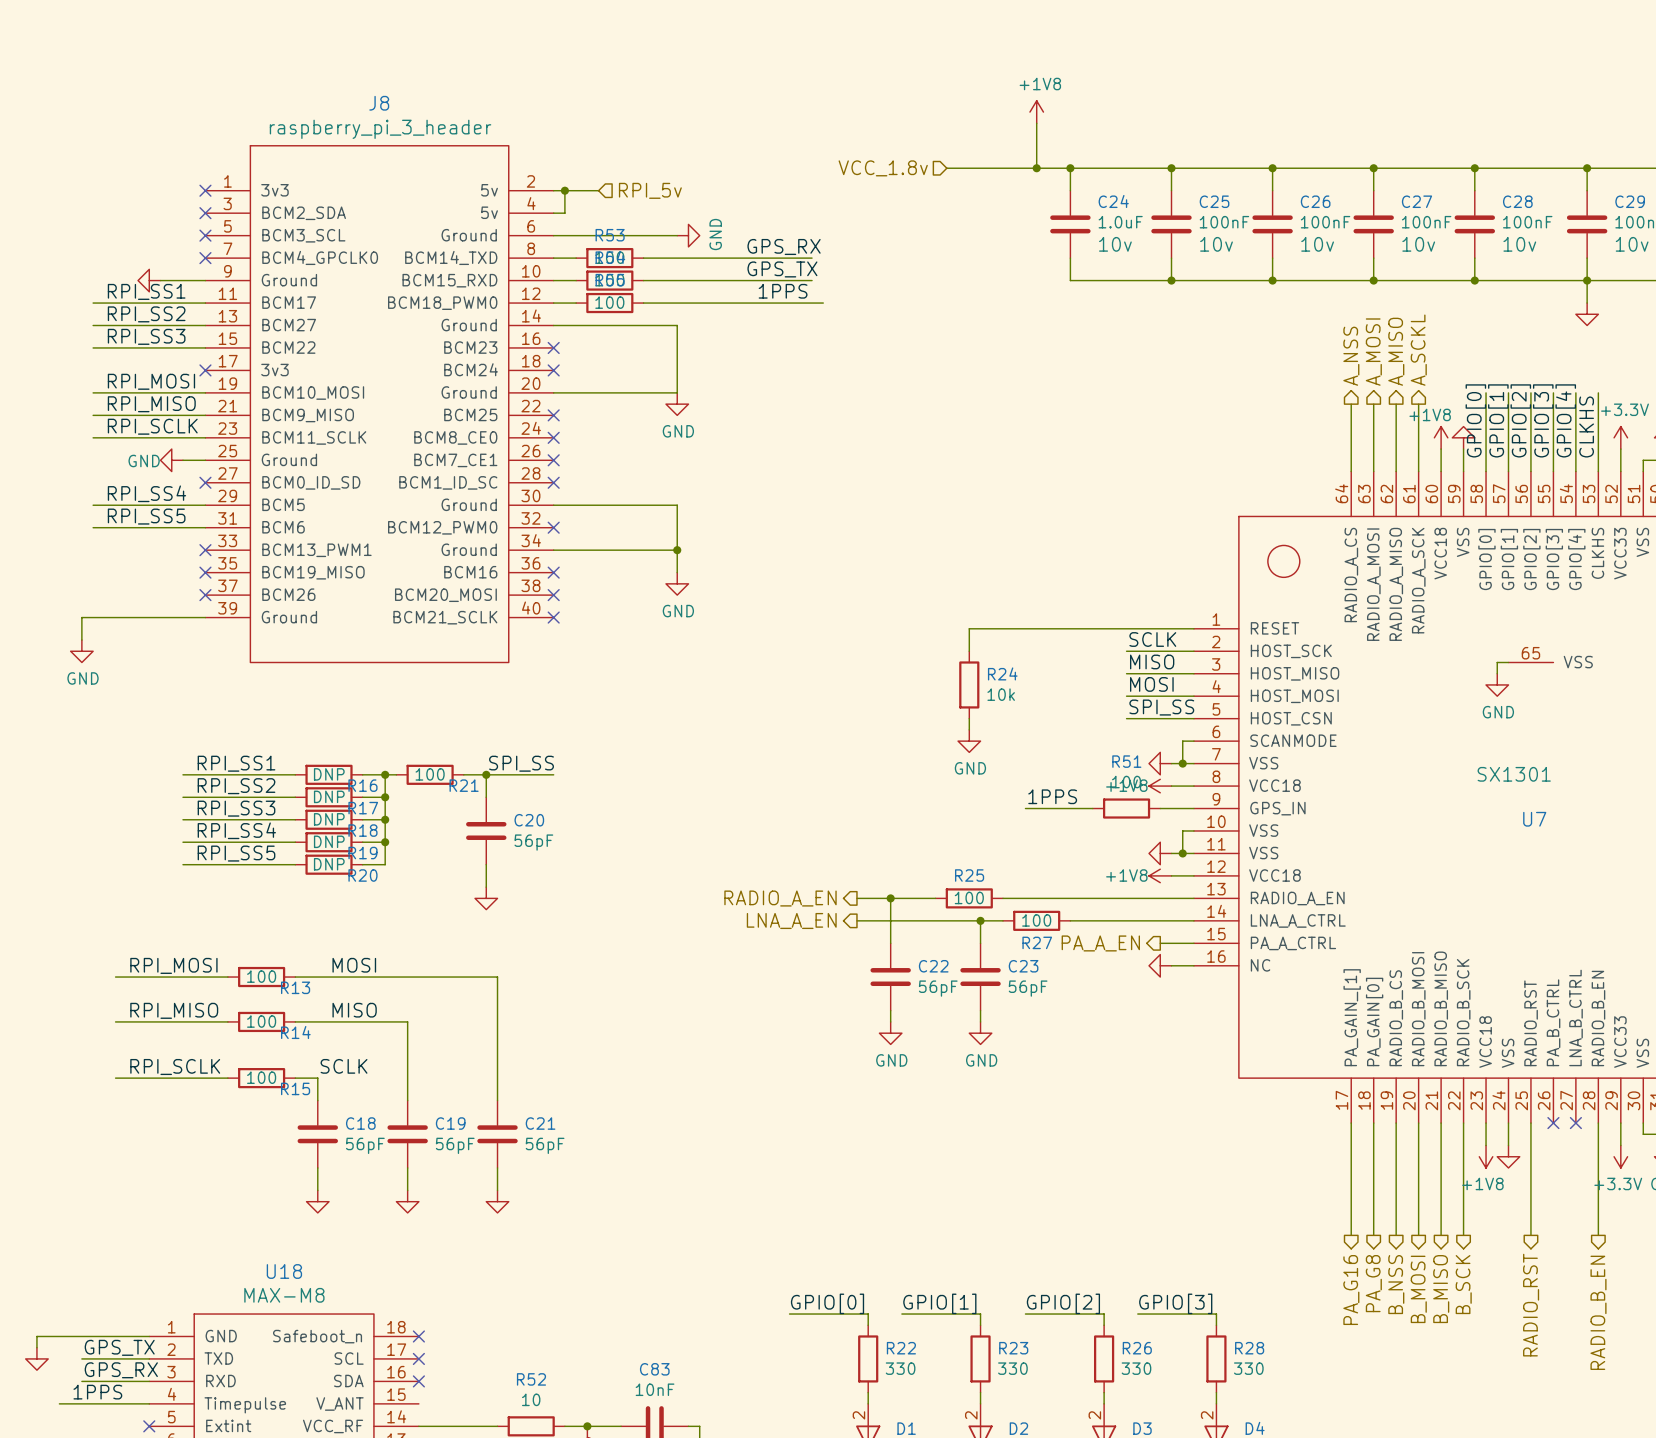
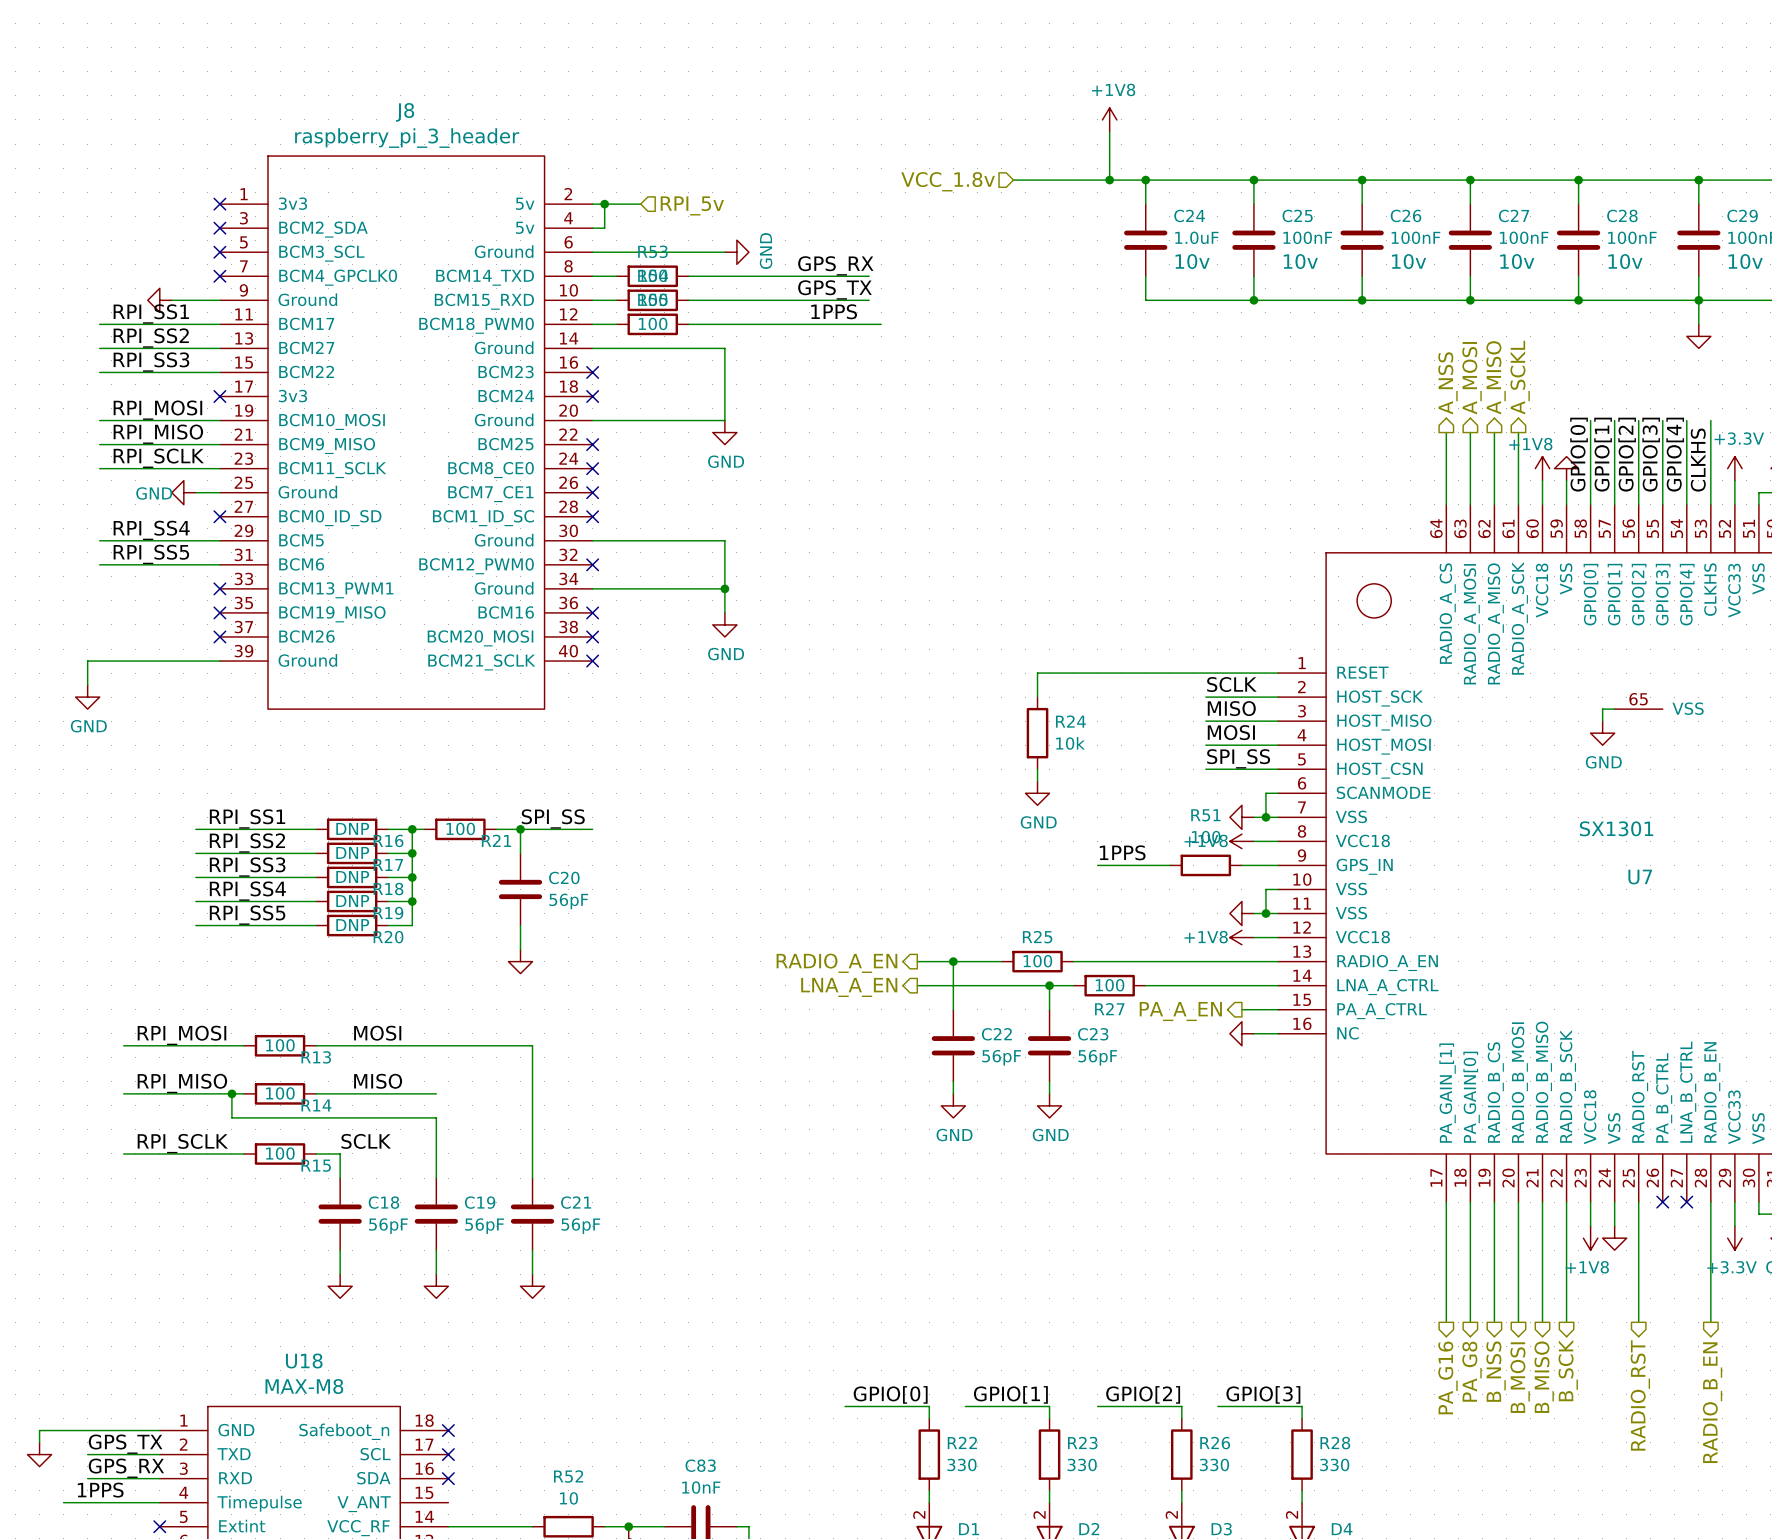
junction: none -> (231, 1093)
wire: (407, 1021) (407, 1044) -> (231, 1093) (231, 1117) (436, 1117)

